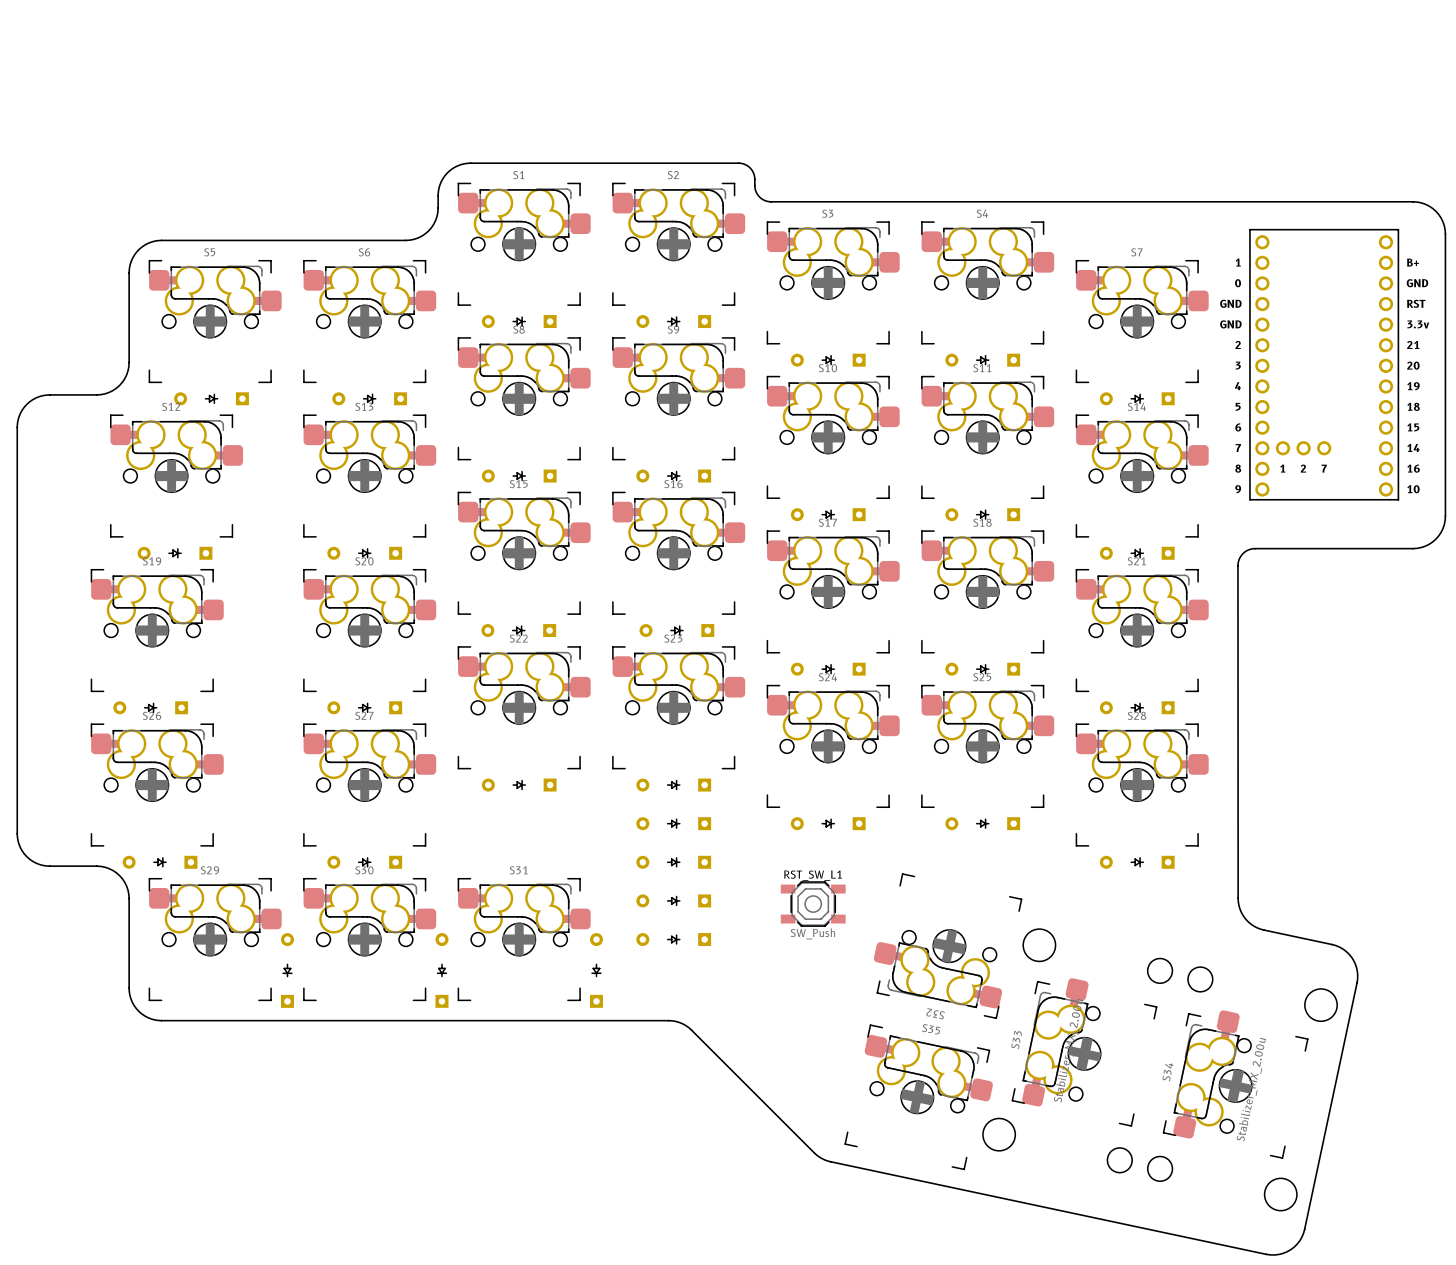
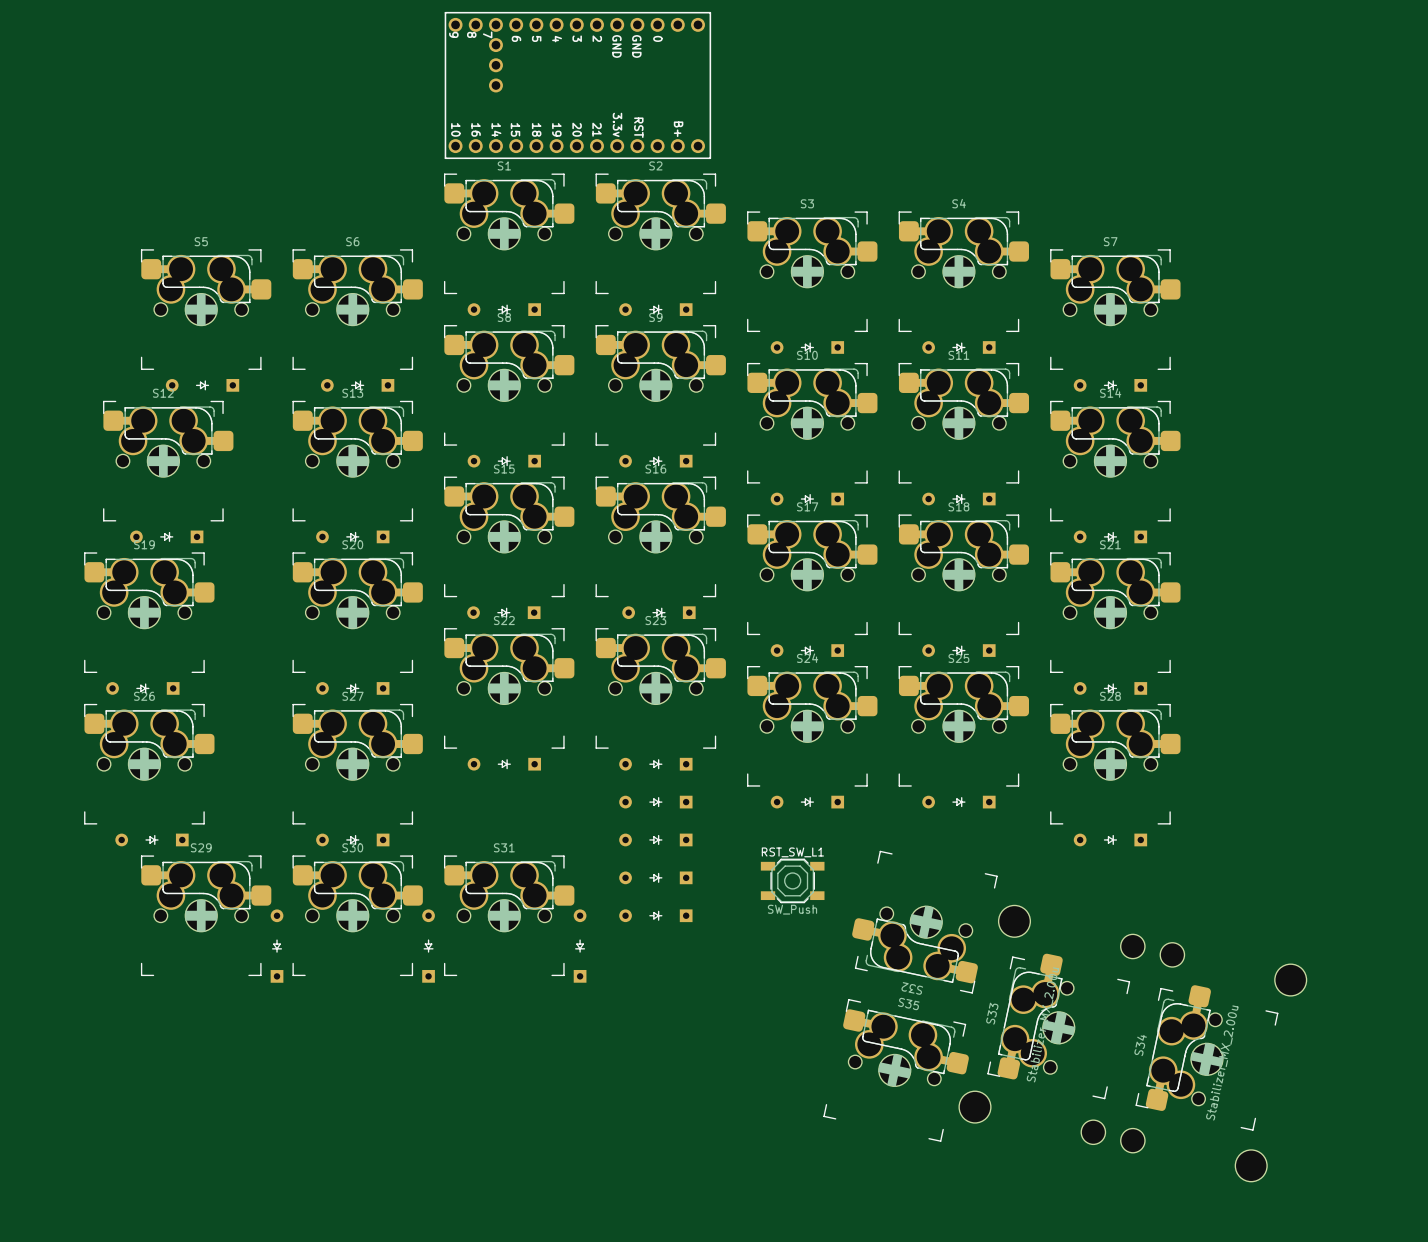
part: none -> (577, 85)
board edge: (470, 163) (740, 163) (748, 166) (753, 172) (755, 189) (758, 195) (764, 200) (771, 201) (1412, 201) (1425, 204) (1438, 214) (1444, 225) (1445, 234) (1445, 516) (1441, 532) (1432, 541) (1417, 548) (1253, 548) (1243, 553) (1238, 563) (1238, 898) (1240, 909) (1247, 921) (1260, 929) (1332, 944) (1342, 948) (1352, 958) (1357, 972) (1357, 983) (1304, 1229) (1299, 1240) (1294, 1247) (1283, 1253) (1266, 1254) (827, 1160) (814, 1152) (691, 1030) (674, 1021) (161, 1020) (147, 1017) (136, 1008) (129, 991) (129, 898) (126, 886) (122, 878) (112, 870) (100, 866) (38, 864) (24, 853) (18, 840) (17, 427) (19, 416) (26, 404) (38, 396) (100, 394) (112, 390) (122, 382) (128, 370) (129, 362) (129, 269) (134, 255) (144, 245) (161, 240) (414, 239) (428, 230) (435, 220) (438, 188) (445, 175) (456, 166) (470, 163) -> none
part: (1324, 364) -> none

